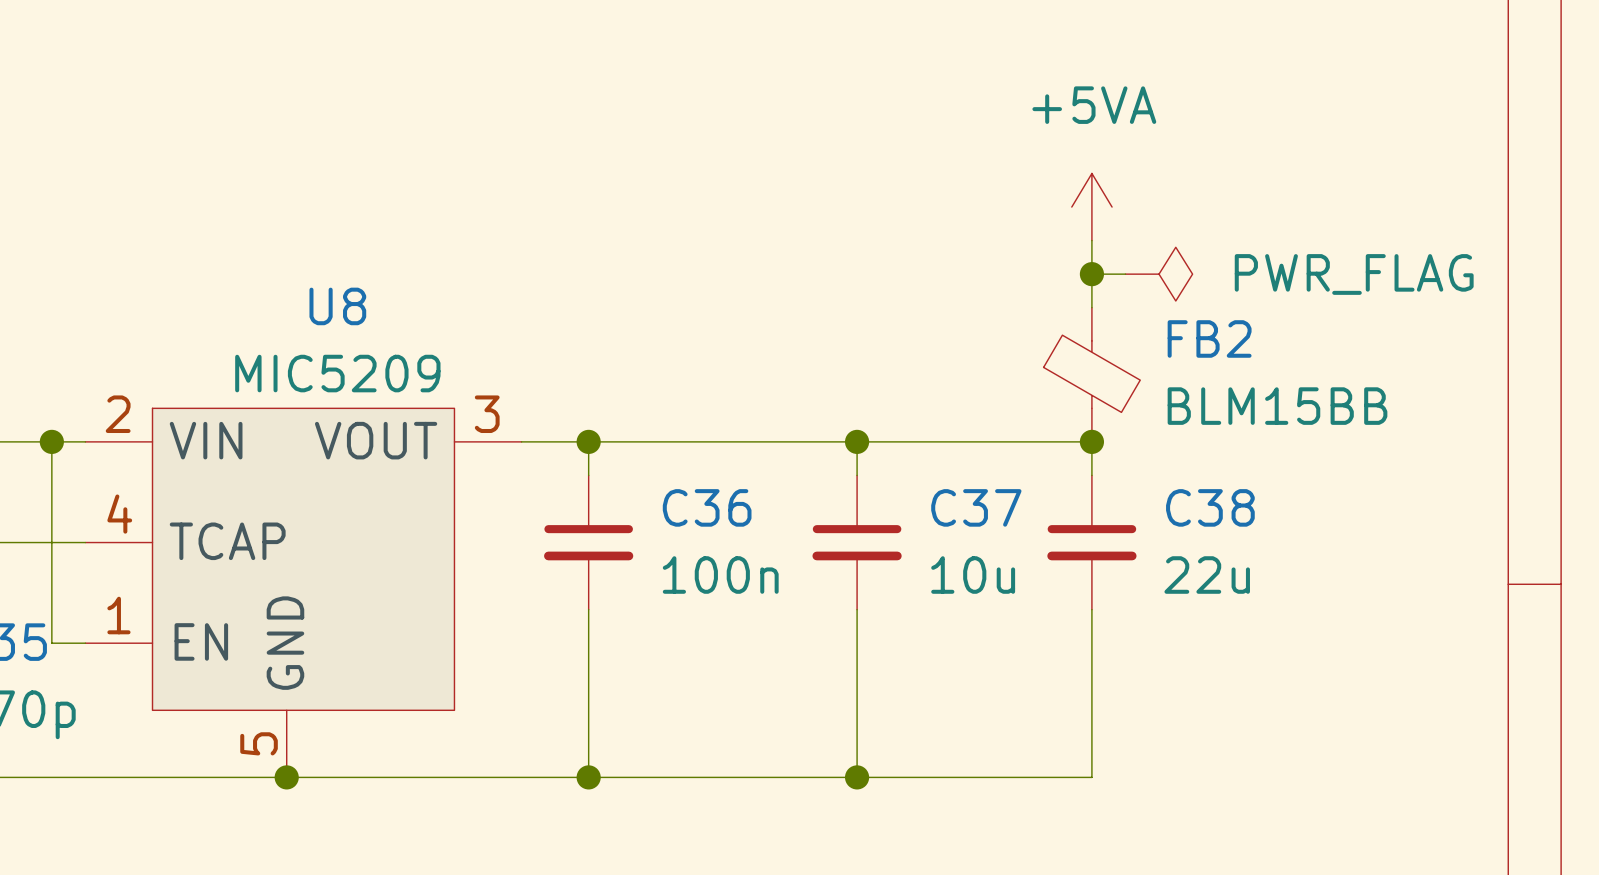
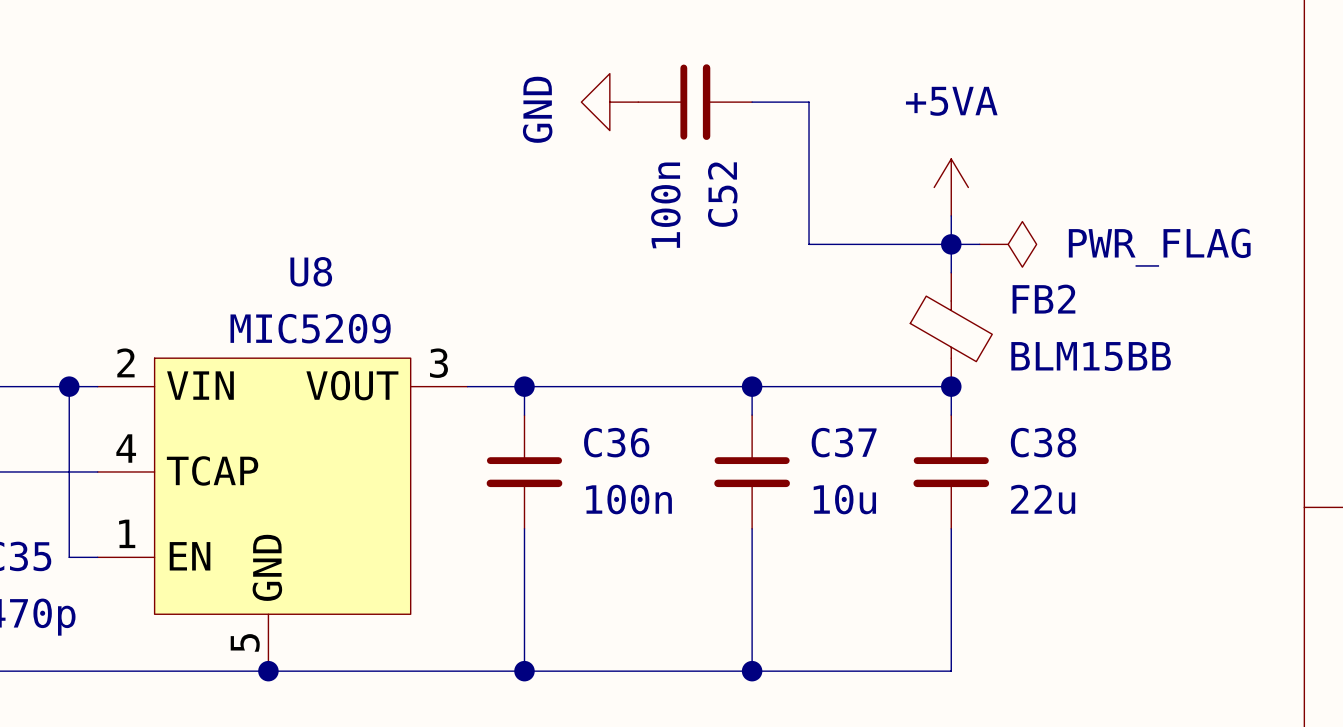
power symbol: none -> GND (609, 102)
C52: none -> 100n (695, 102)
wire: none -> (752, 102) (809, 102) (809, 244) (951, 244)

